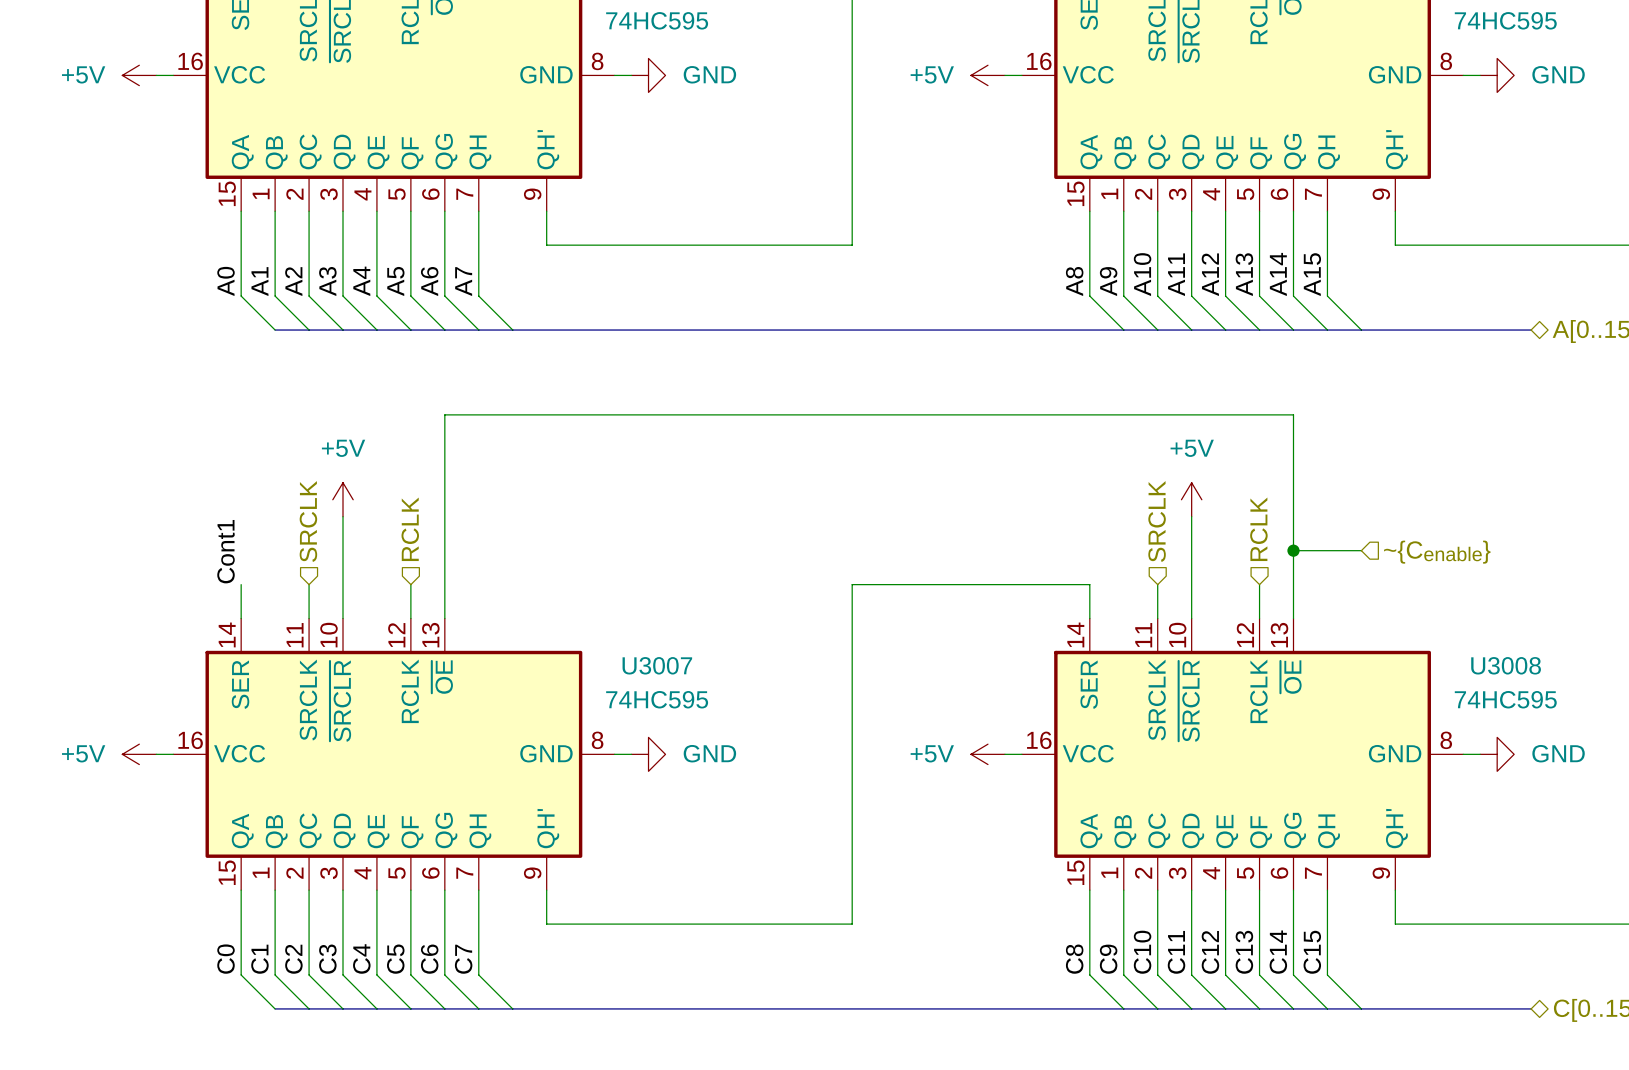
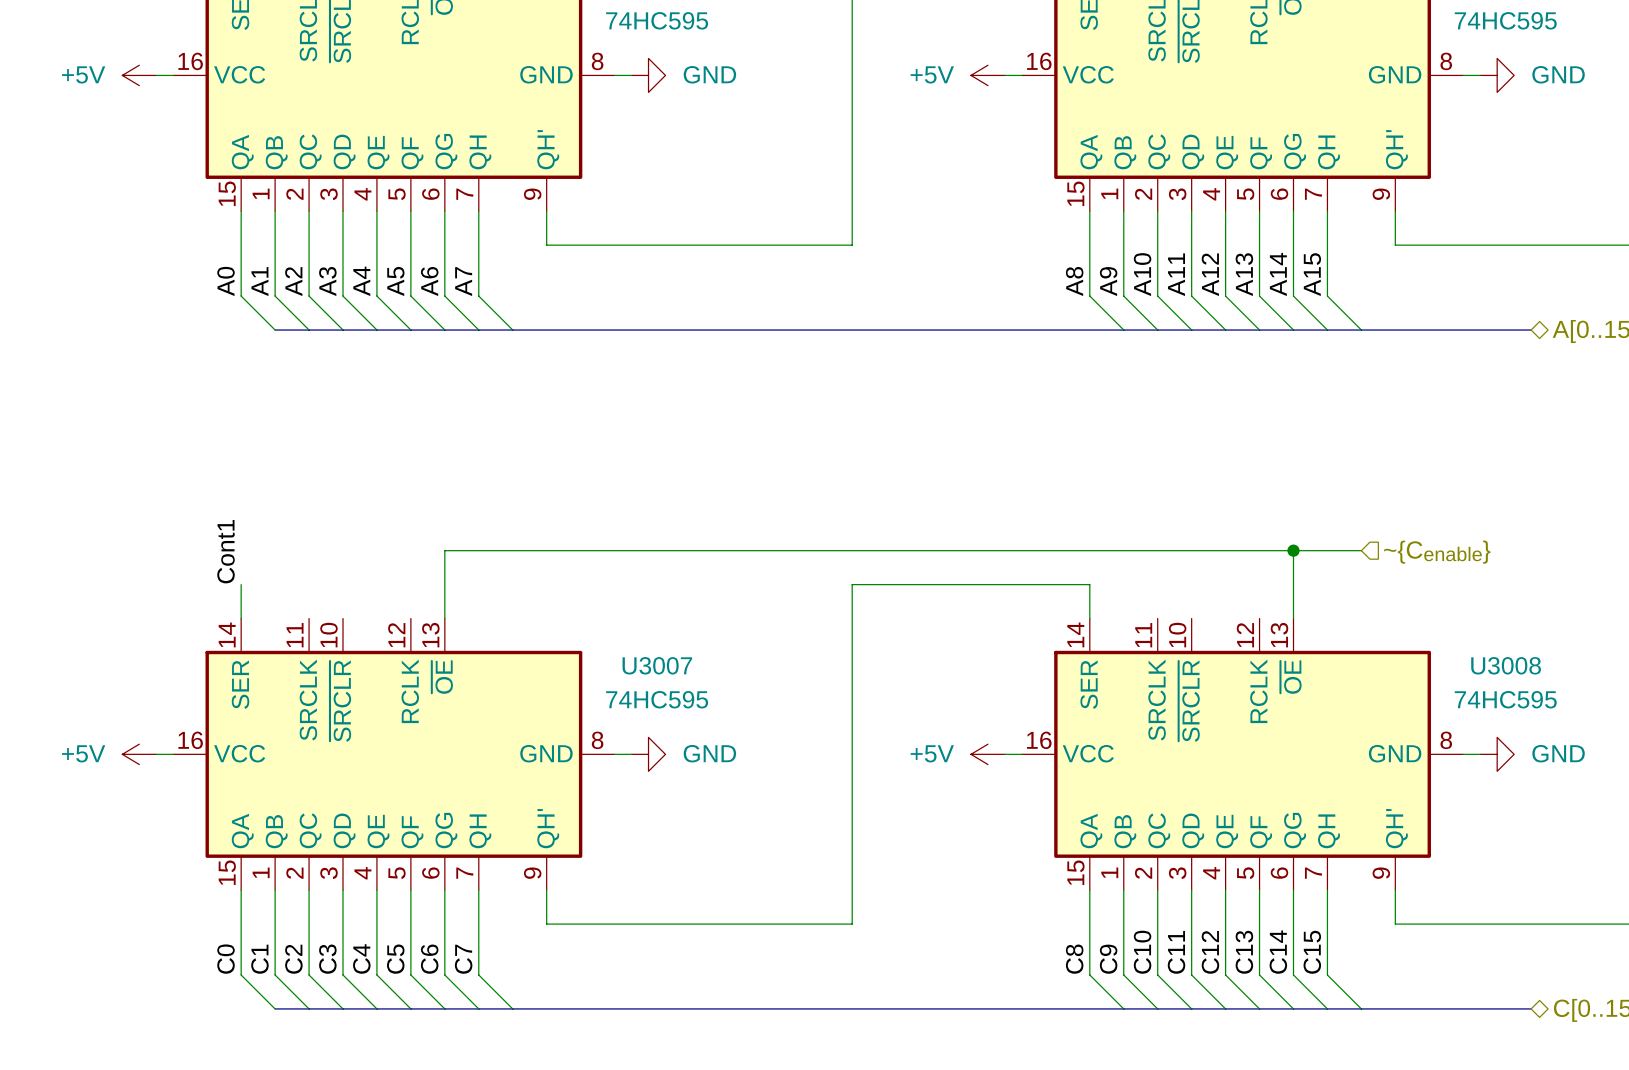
power symbol: +5V (343, 499) -> none
power symbol: +5V (1191, 499) -> none
wire: (343, 516) (343, 618) -> none
wire: (1191, 516) (1191, 618) -> none
hierarchical label: SRCLK (308, 521) -> none
hierarchical label: SRCLK (1157, 521) -> none
hierarchical label: RCLK (410, 529) -> none
hierarchical label: RCLK (1258, 529) -> none
wire: (444, 550) (444, 414) (1293, 414) (1293, 550) -> (444, 550) (1293, 550)
wire: (309, 584) (309, 618) -> none
wire: (410, 584) (410, 618) -> none
wire: (1157, 584) (1157, 618) -> none
wire: (1259, 584) (1259, 618) -> none

